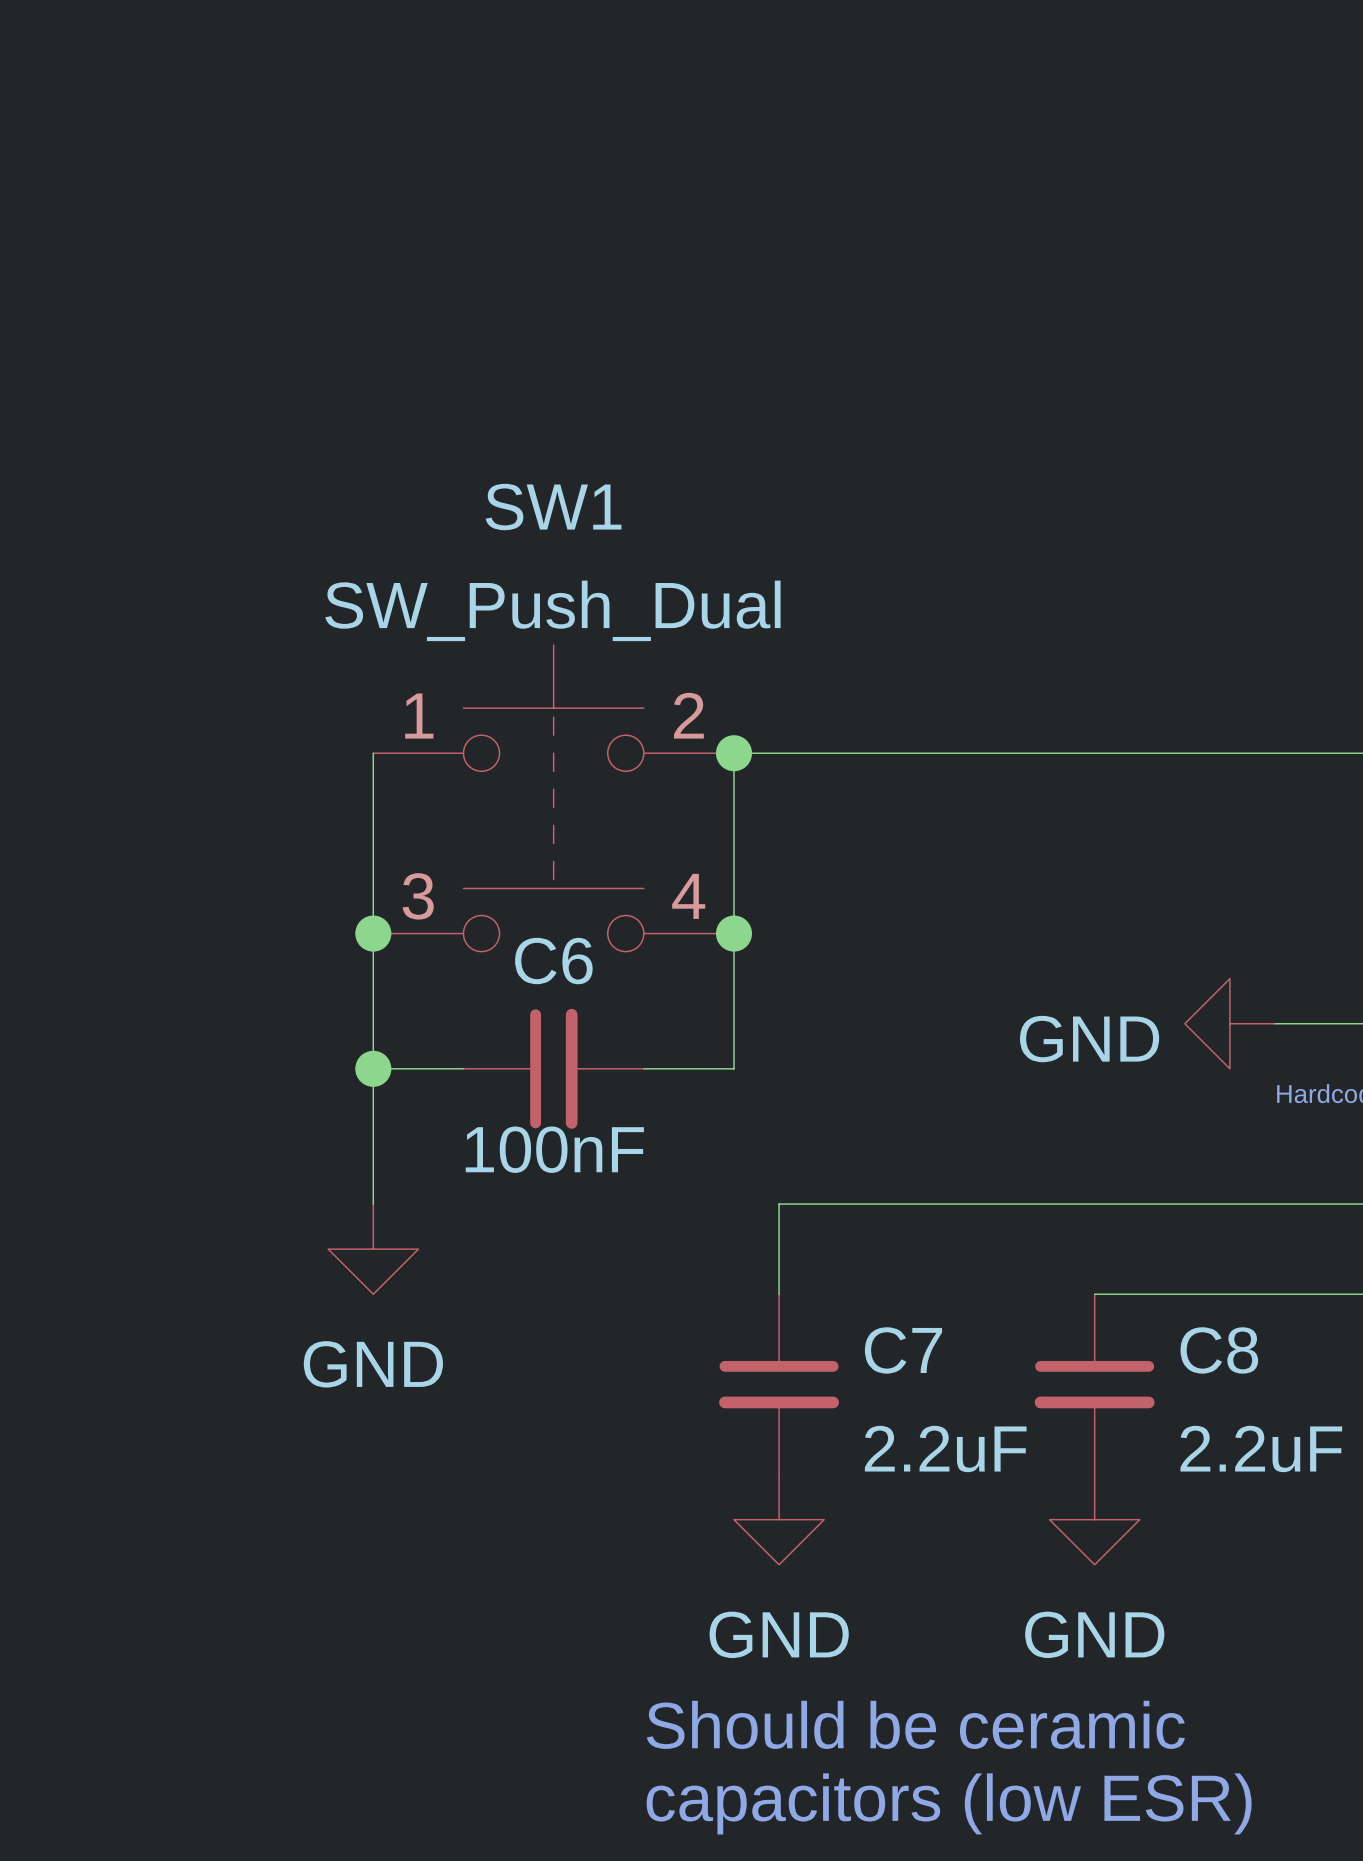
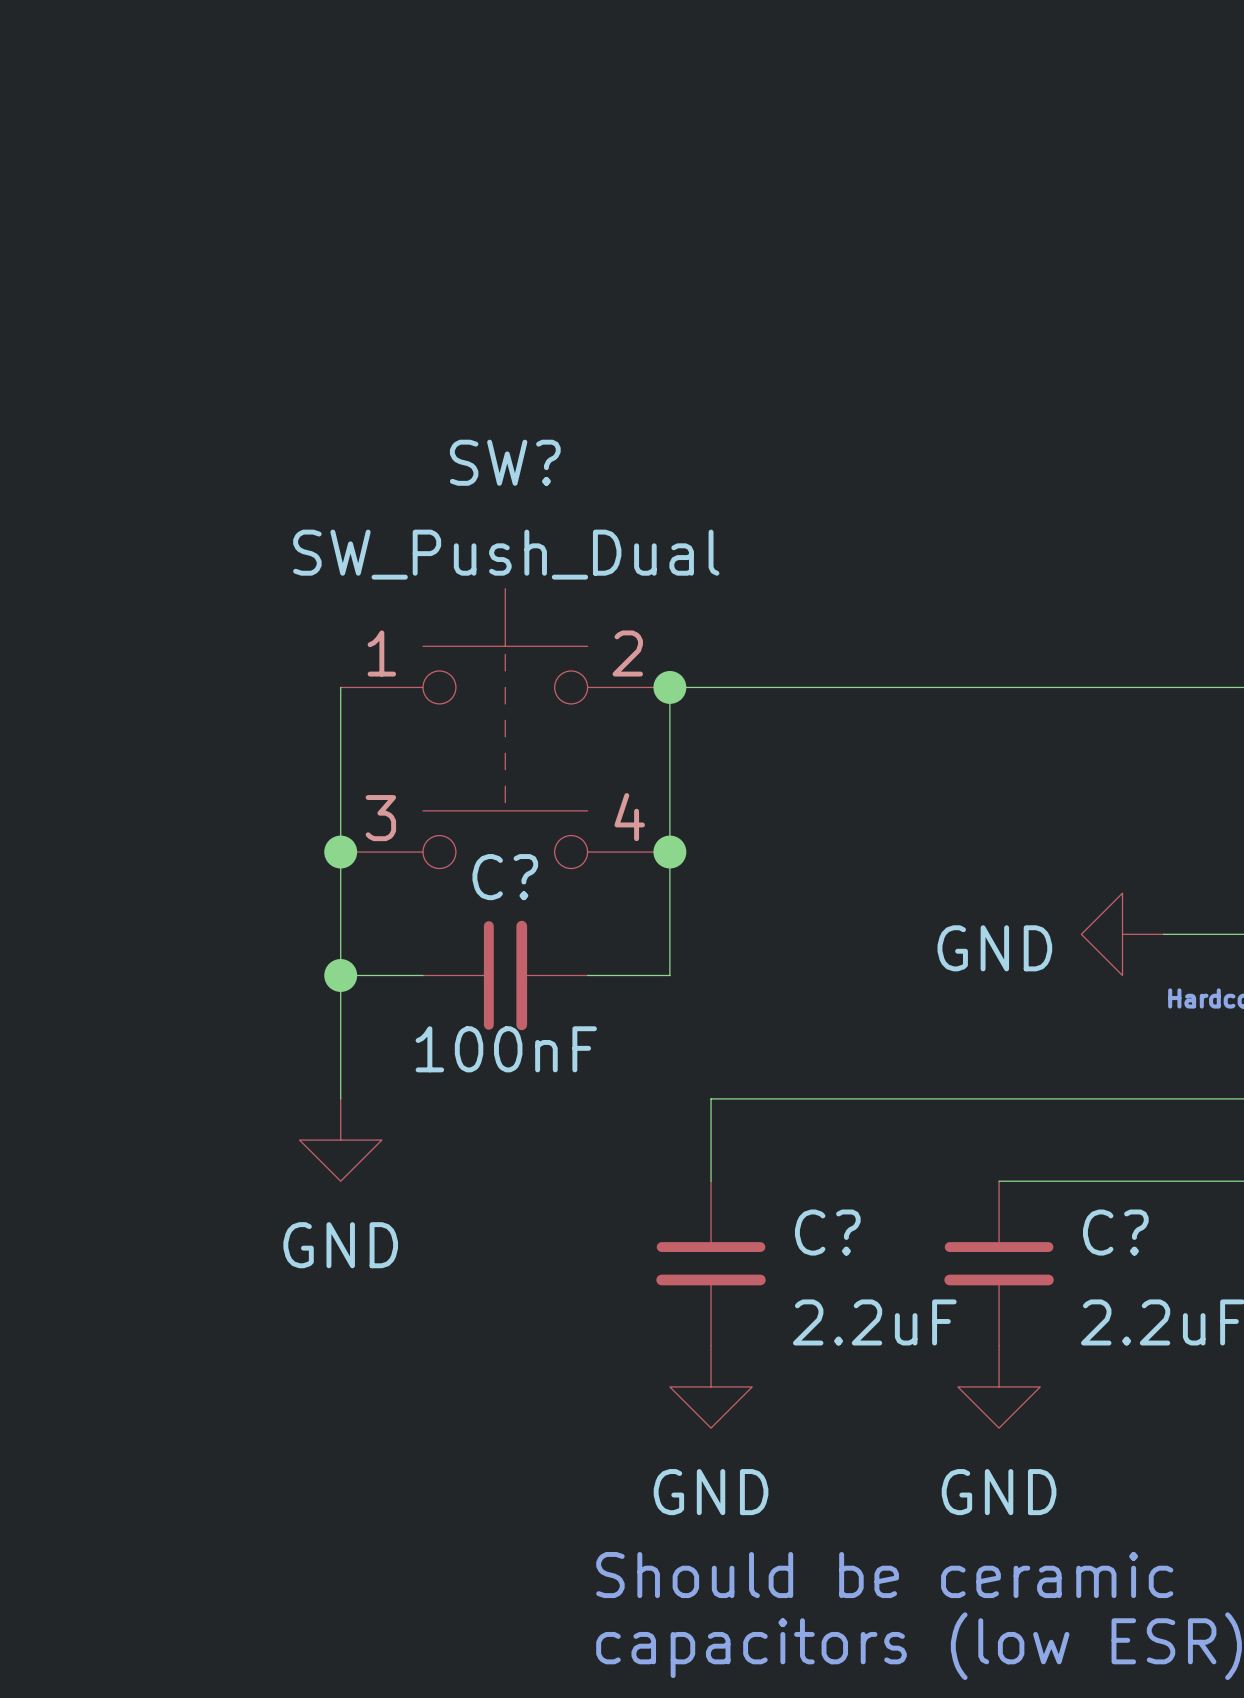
SW1 name: SW1 (553, 507) -> SW? (505, 462)
C6 name: C6 (553, 961) -> C? (505, 877)
C7 name: C7 (903, 1350) -> C? (827, 1232)
C8 name: C8 (1219, 1350) -> C? (1115, 1232)

